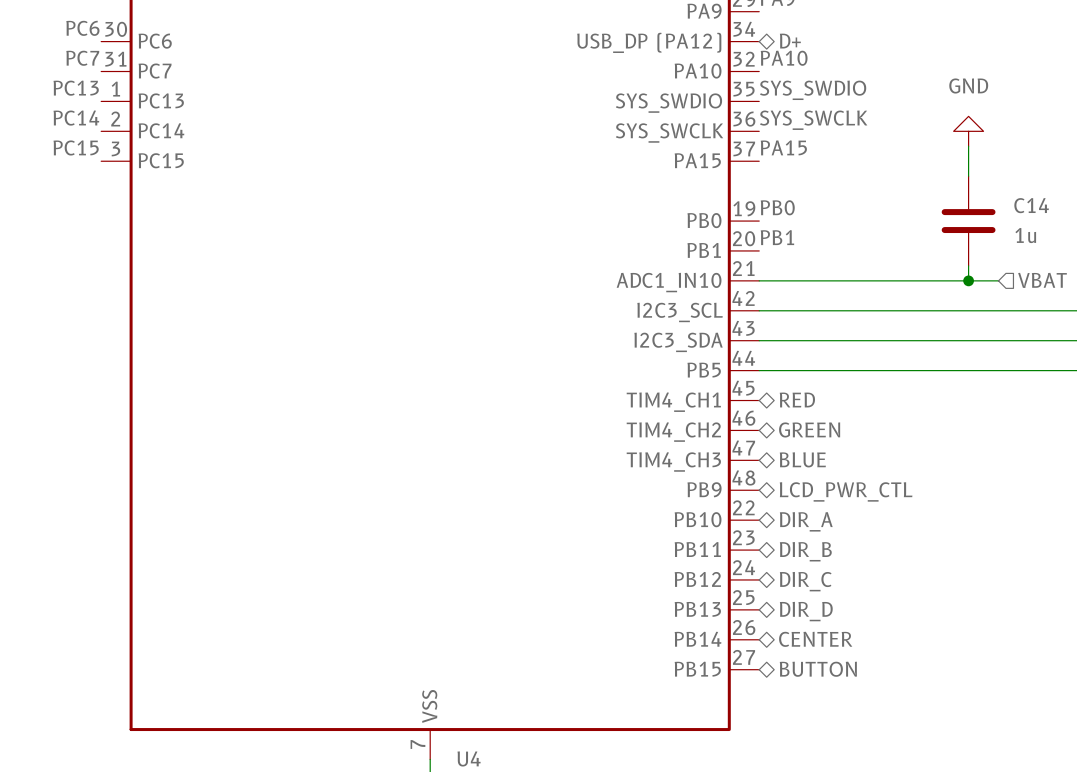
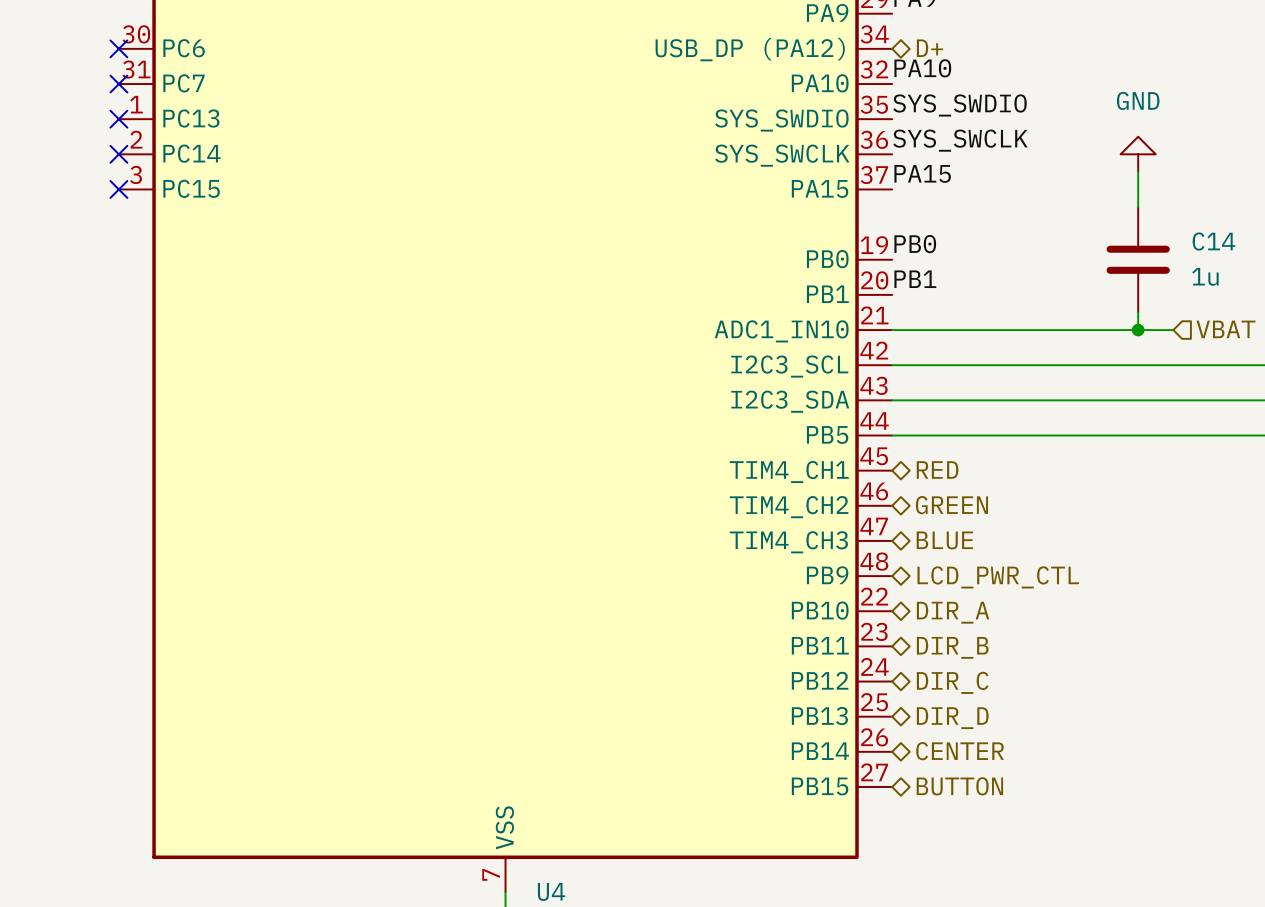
label: PC6 (82, 28) -> none
no-connect mark: none -> (118, 48)
label: PC7 (82, 58) -> none
no-connect mark: none -> (118, 84)
label: PC13 (76, 88) -> none
no-connect mark: none -> (118, 119)
label: PC14 (76, 118) -> none
no-connect mark: none -> (118, 154)
label: PC15 (76, 147) -> none
no-connect mark: none -> (118, 189)

